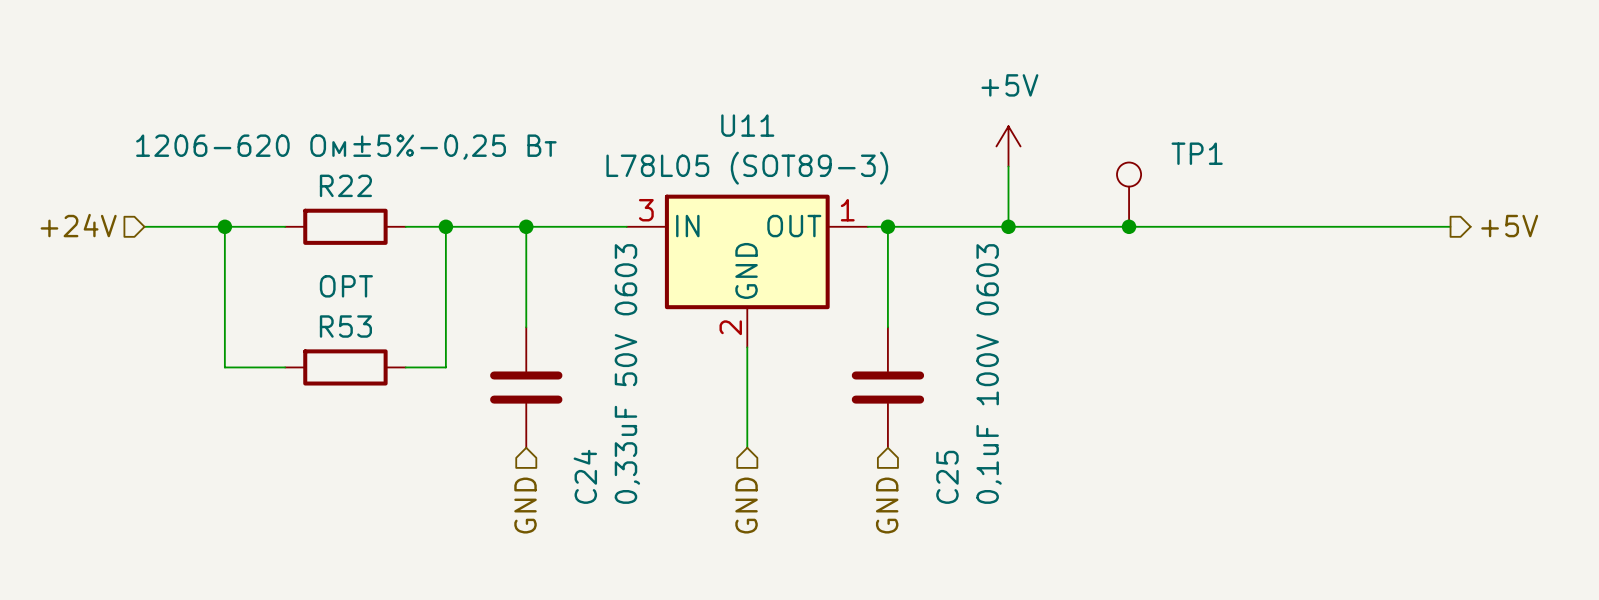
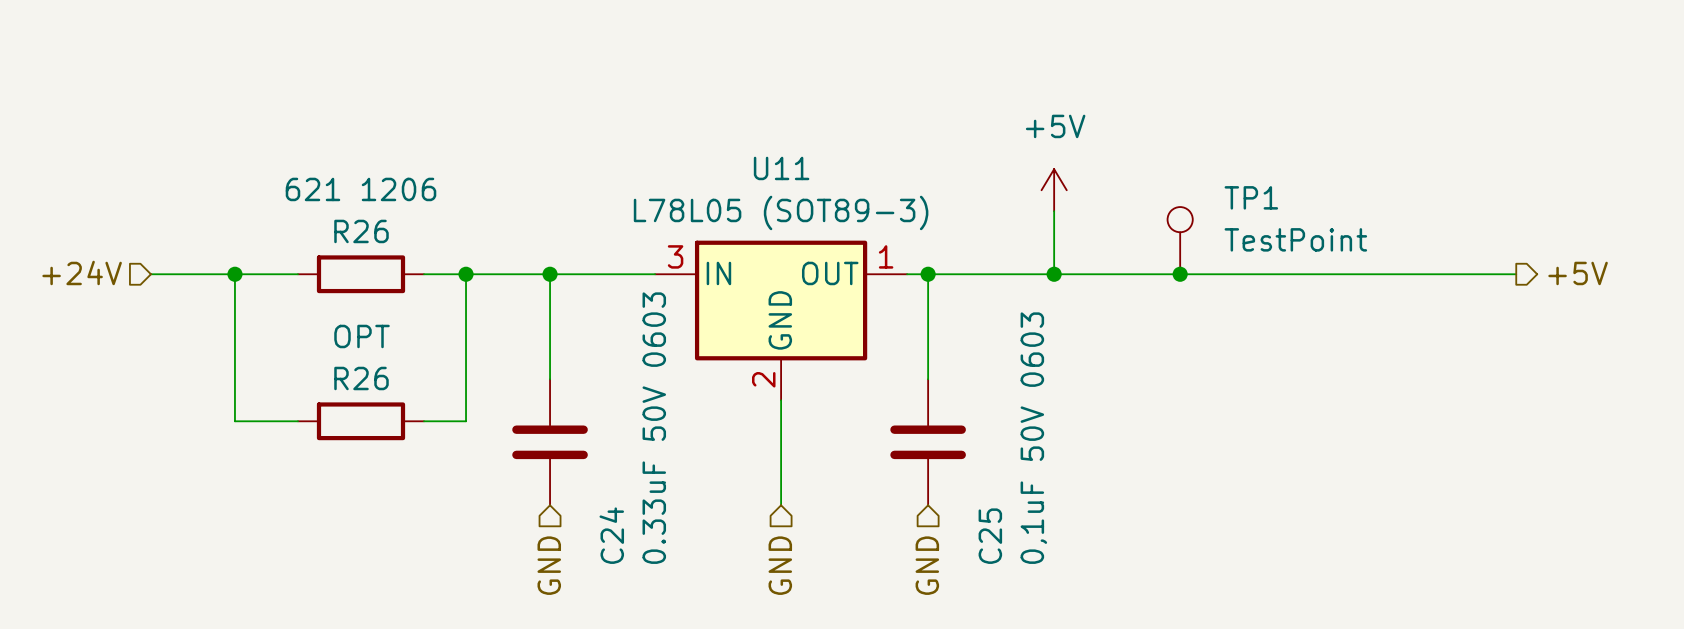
R22 value: 1206-620 Ом±5%-0,25 Вт (346, 147) -> 621 1206 (361, 189)
R22 name: R22 (345, 185) -> R26 (361, 231)
TP1 value: none -> TestPoint (1295, 239)
R53 name: R53 (345, 326) -> R26 (361, 378)
C24 value: 0,33uF 50V 0603 (627, 373) -> 0.33uF 50V 0603 (654, 428)
C25 value: 0,1uF 100V 0603 (989, 373) -> 0,1uF 50V 0603 (1033, 438)

